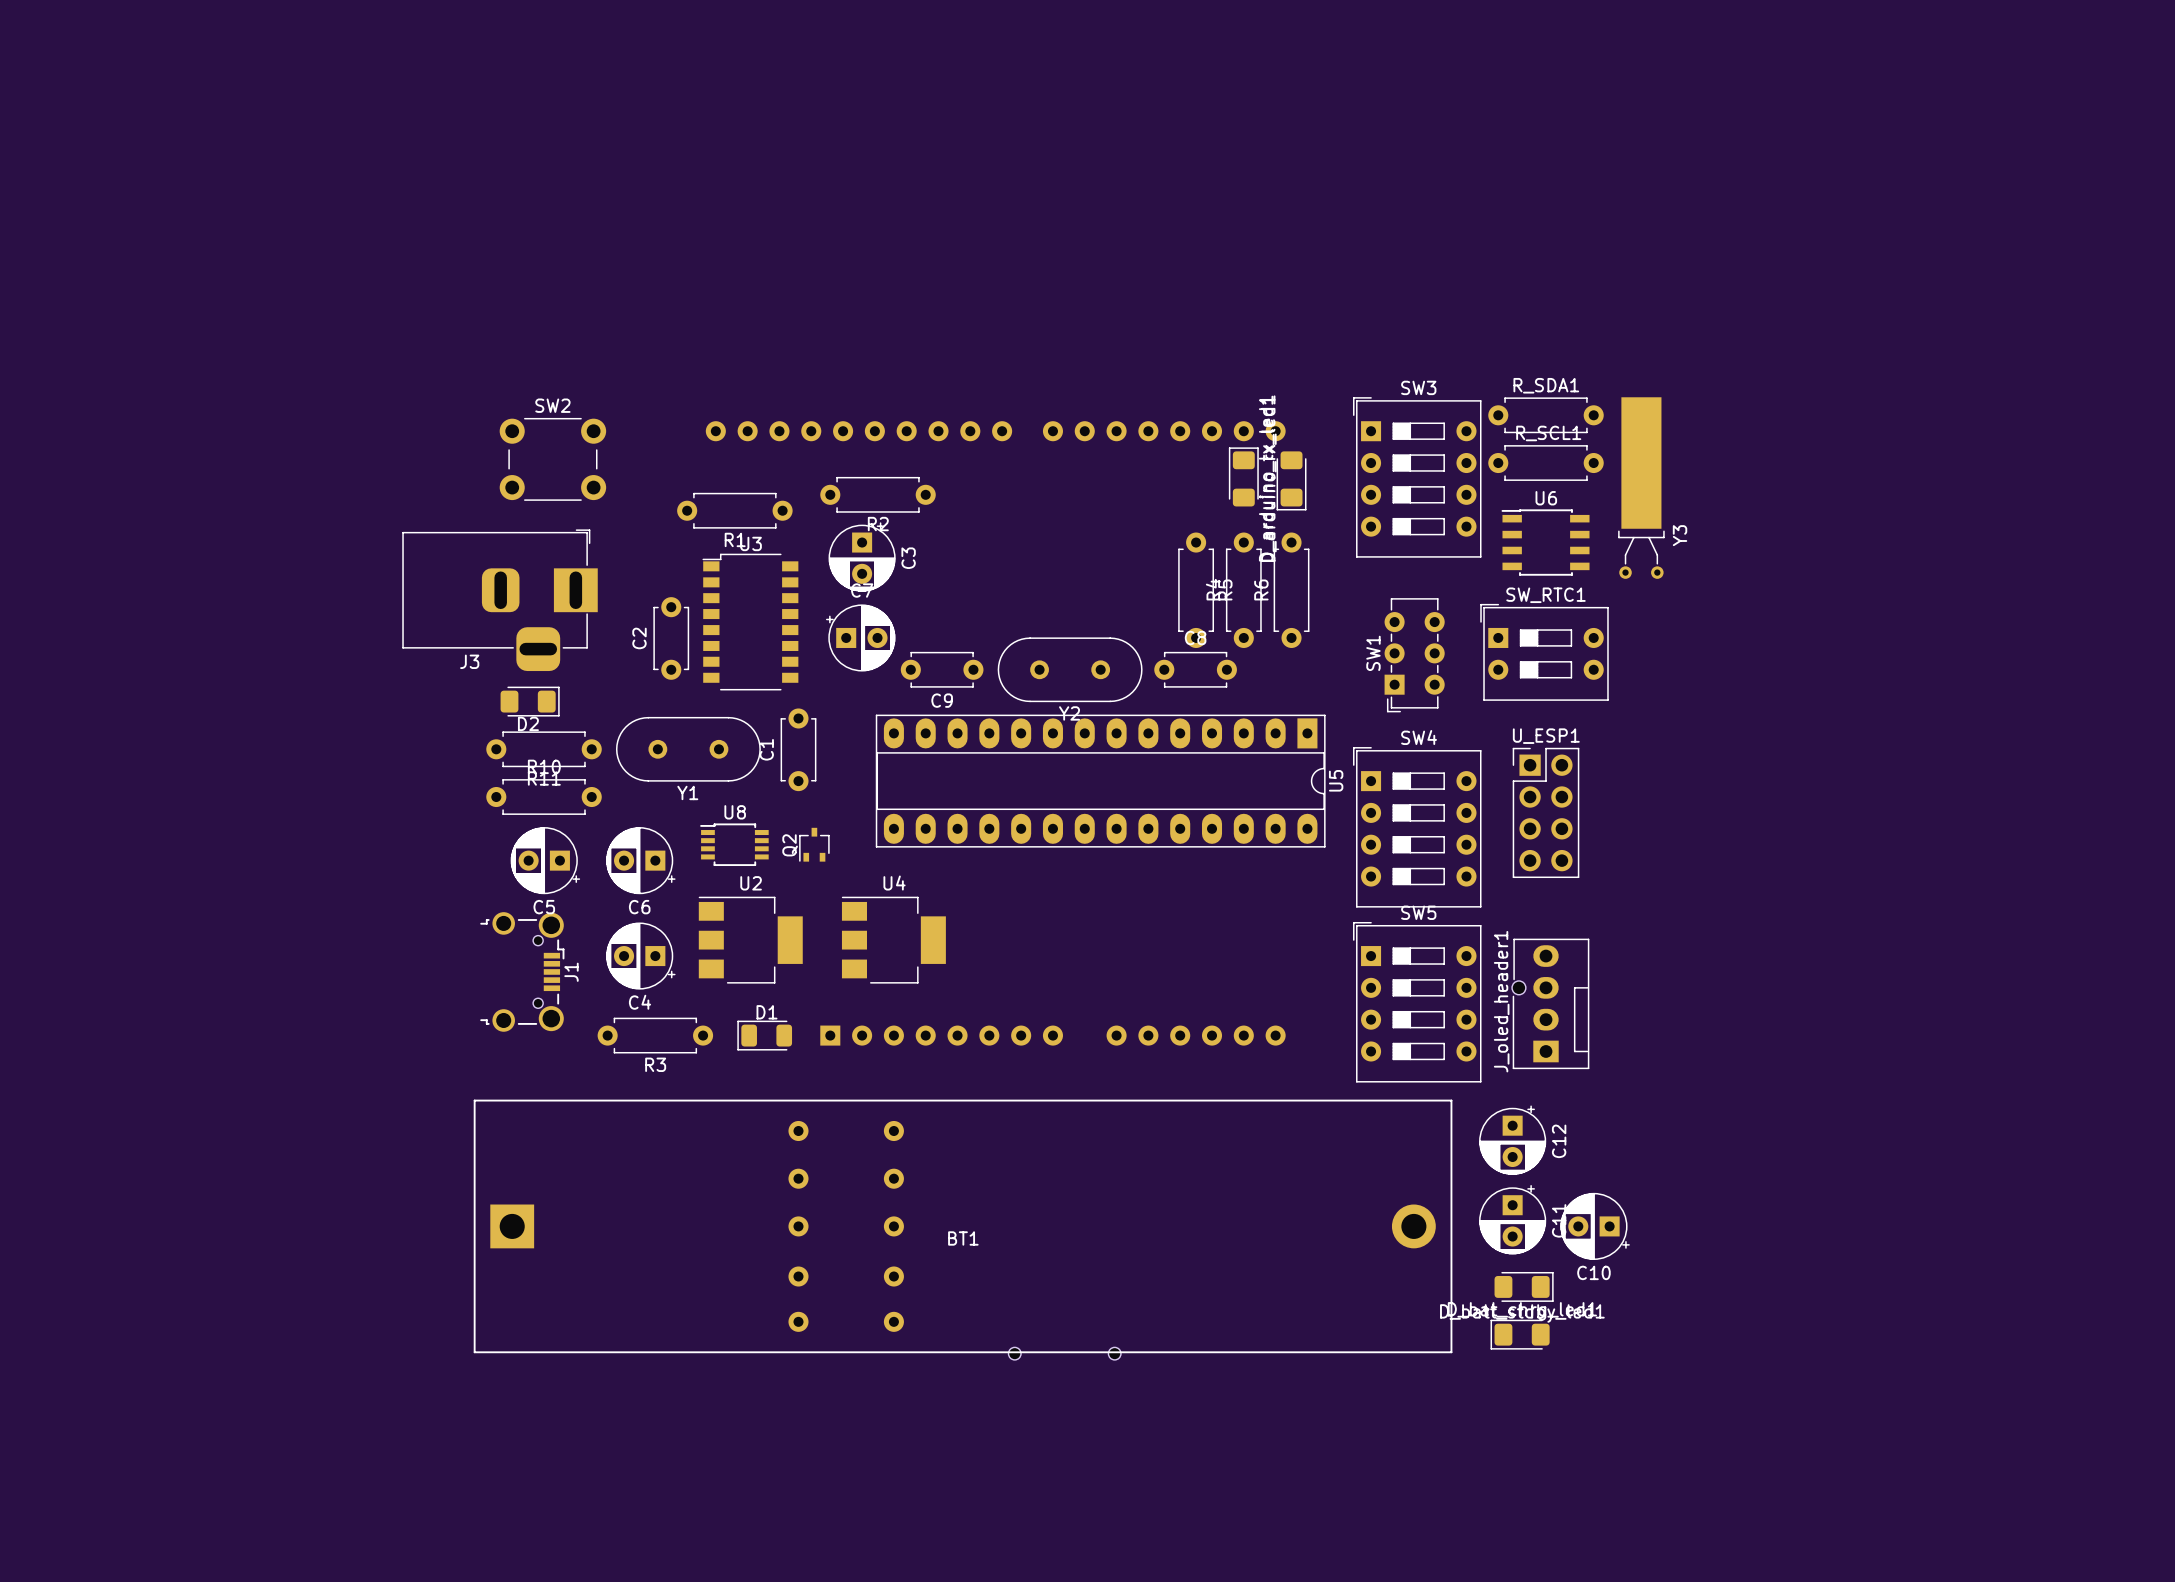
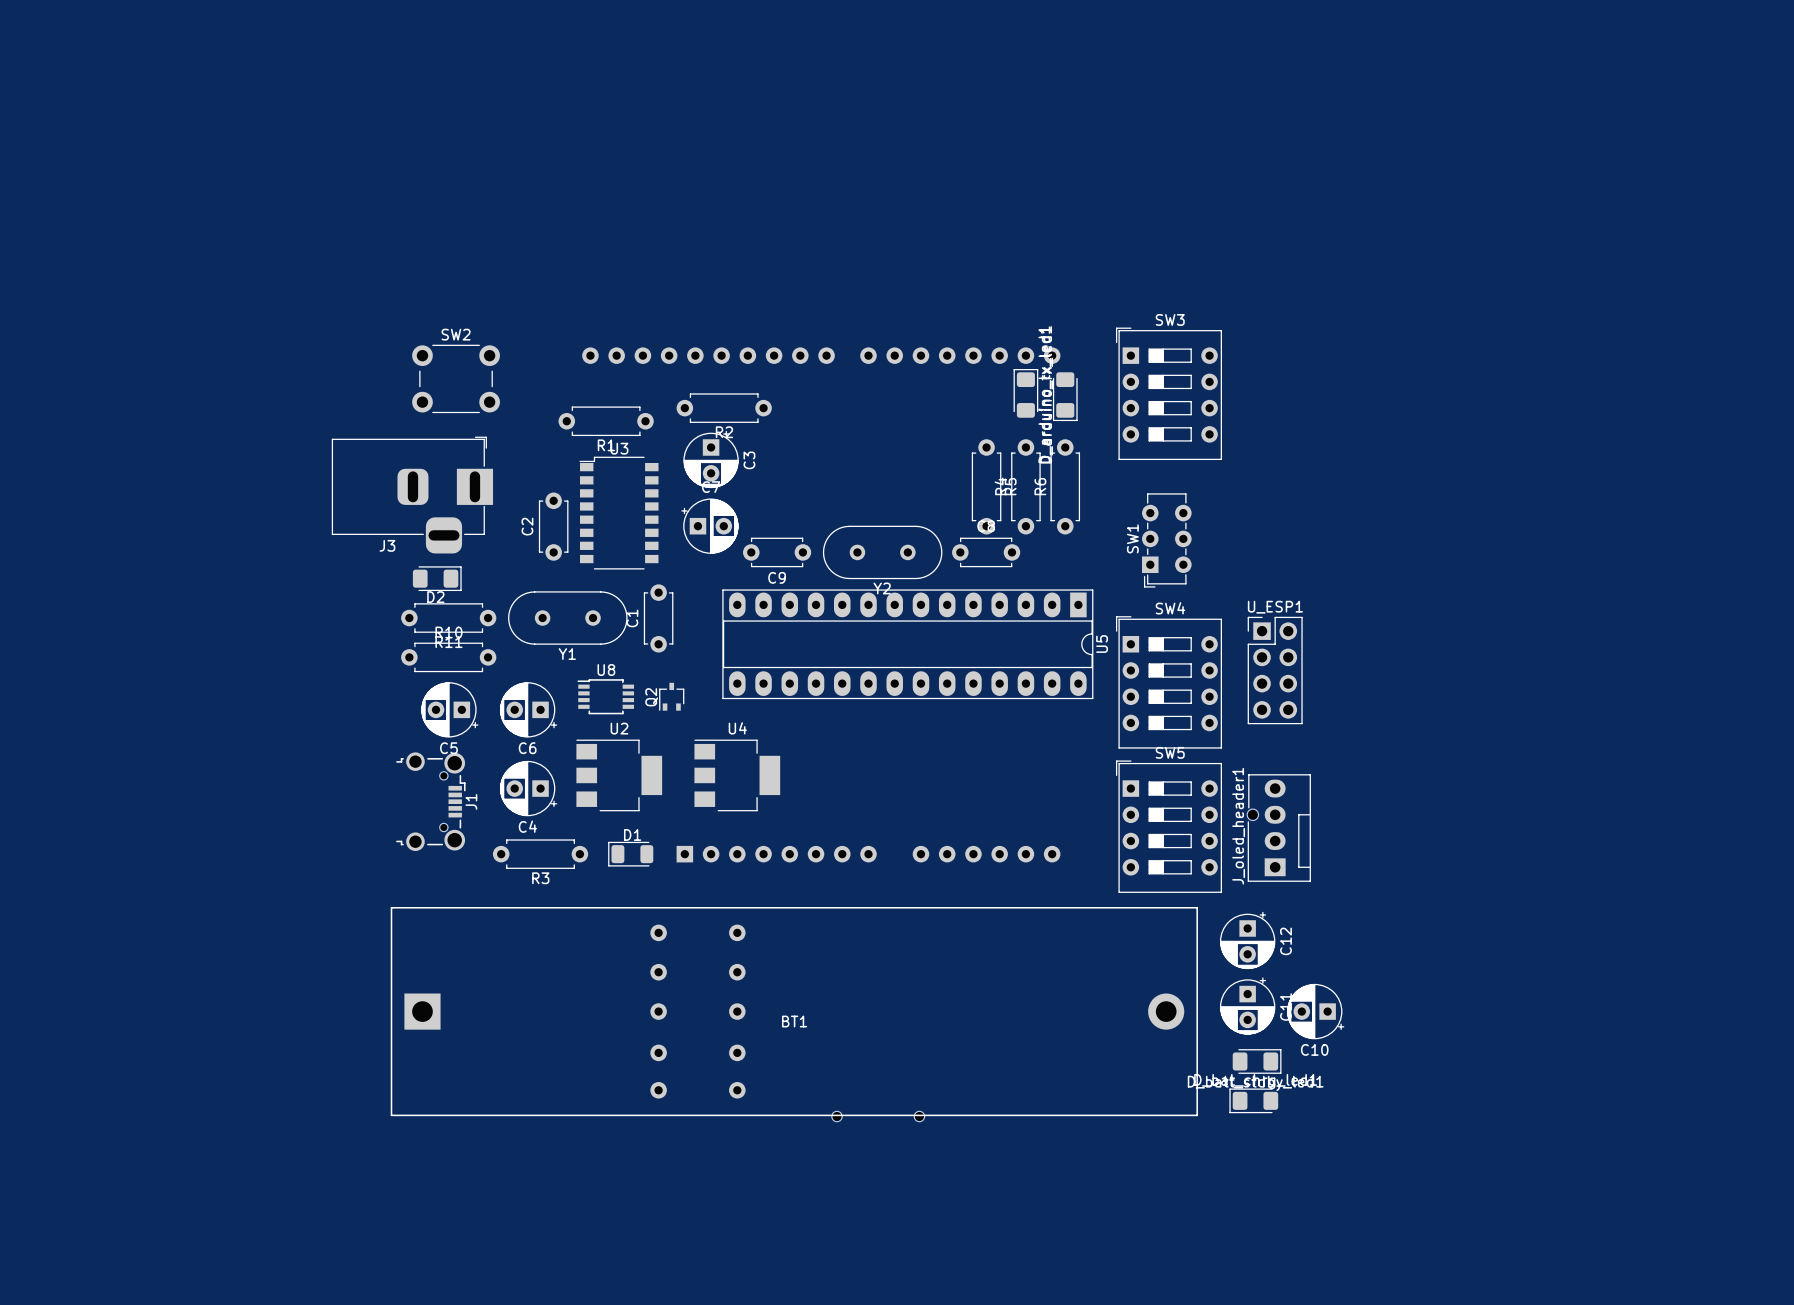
R_SDA1: (1546, 415) -> none
R_SCL1: (1546, 463) -> none
Y3: (1641, 488) -> none
U6: (1545, 542) -> none
SW_RTC1: (1544, 652) -> none

